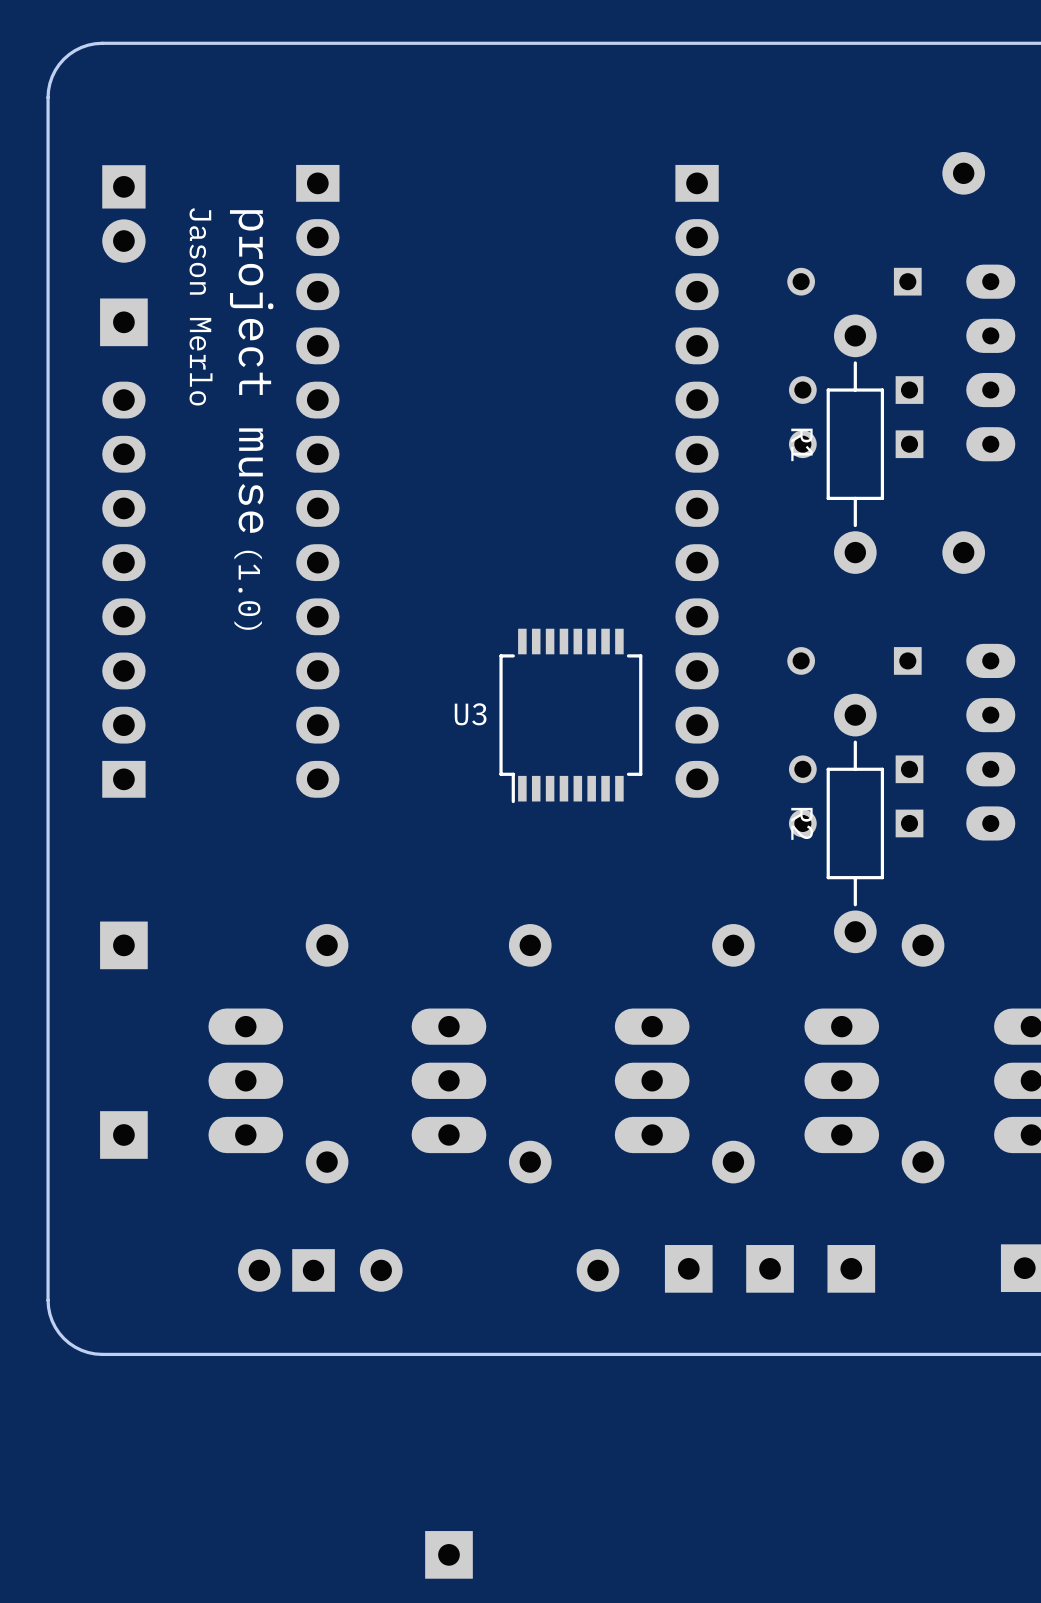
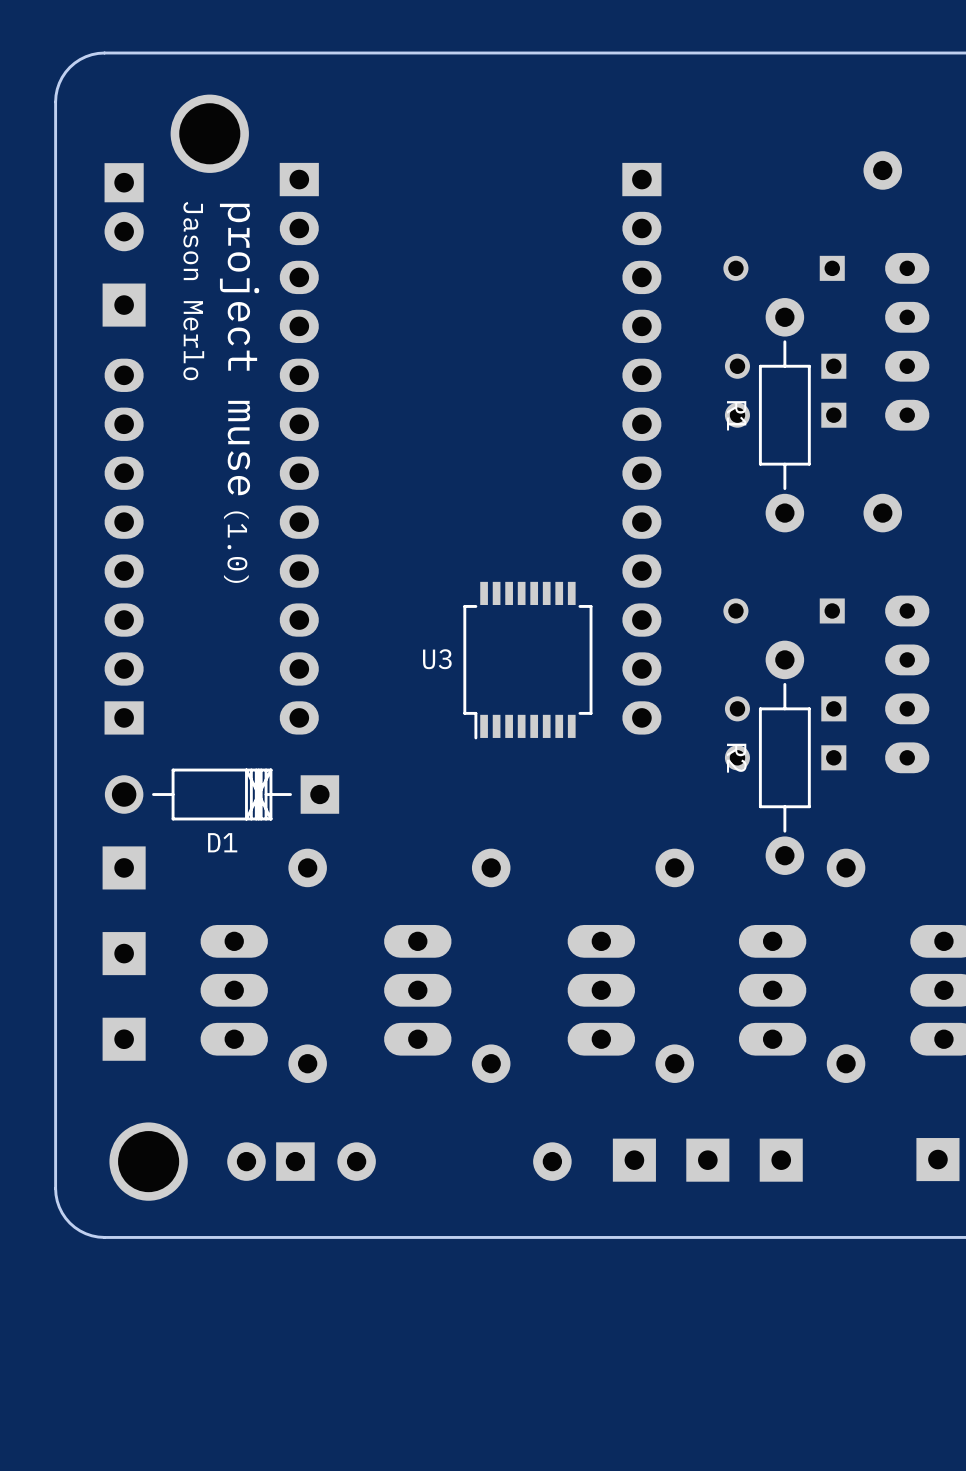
part: none -> (209, 133)
D1: none -> (222, 794)
part: none -> (124, 953)
part: none -> (148, 1161)
part: (448, 1554) -> none

